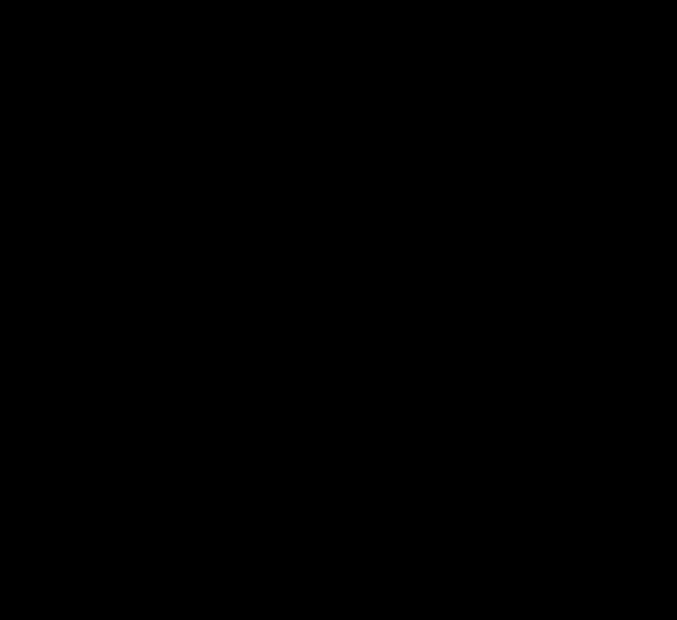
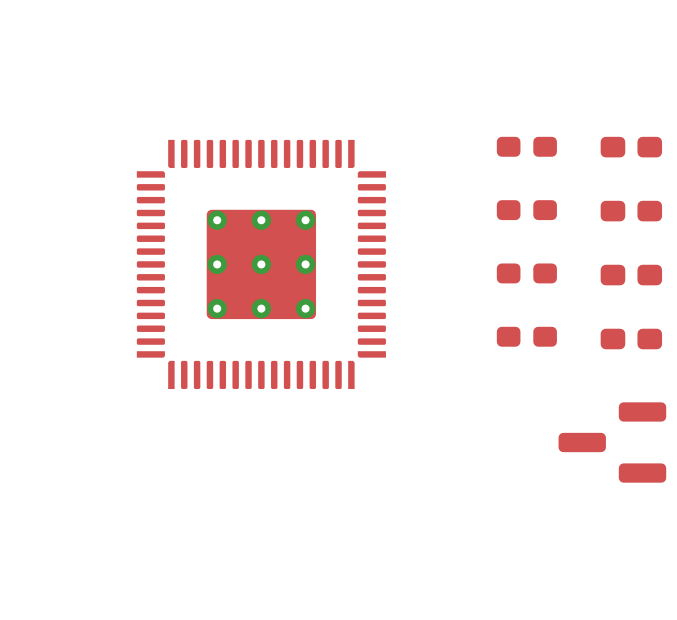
part: none -> (526, 146)
part: none -> (631, 147)
part: none -> (526, 210)
part: none -> (631, 211)
part: none -> (261, 264)
part: none -> (526, 273)
part: none -> (631, 275)
part: none -> (526, 336)
part: none -> (631, 339)
part: none -> (612, 442)

